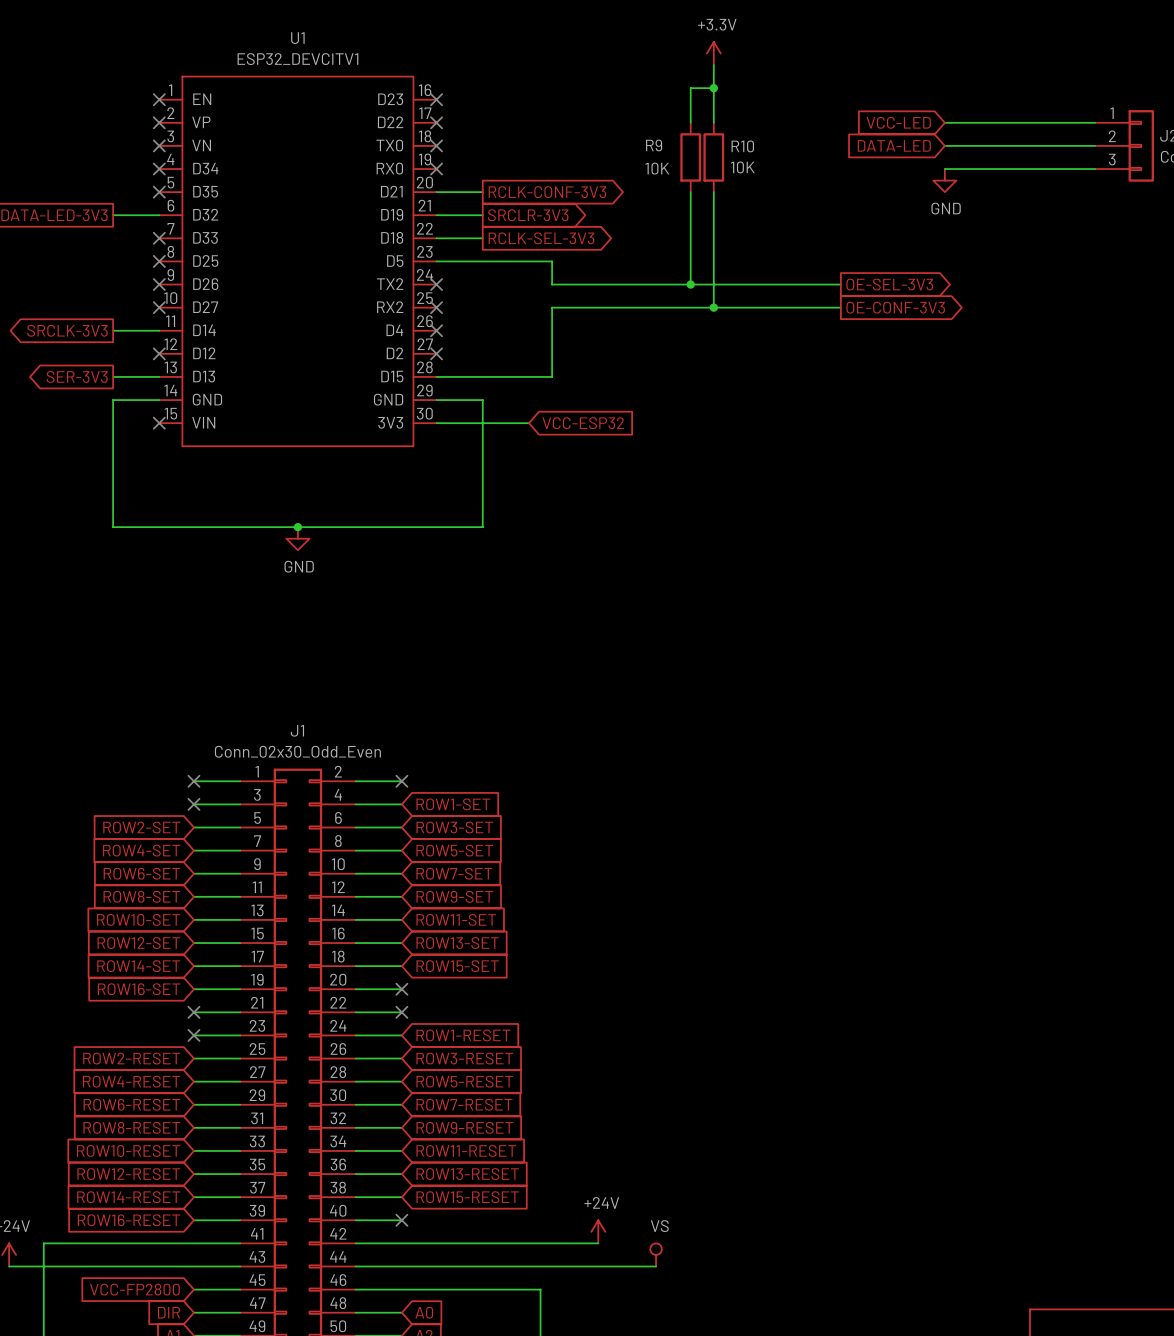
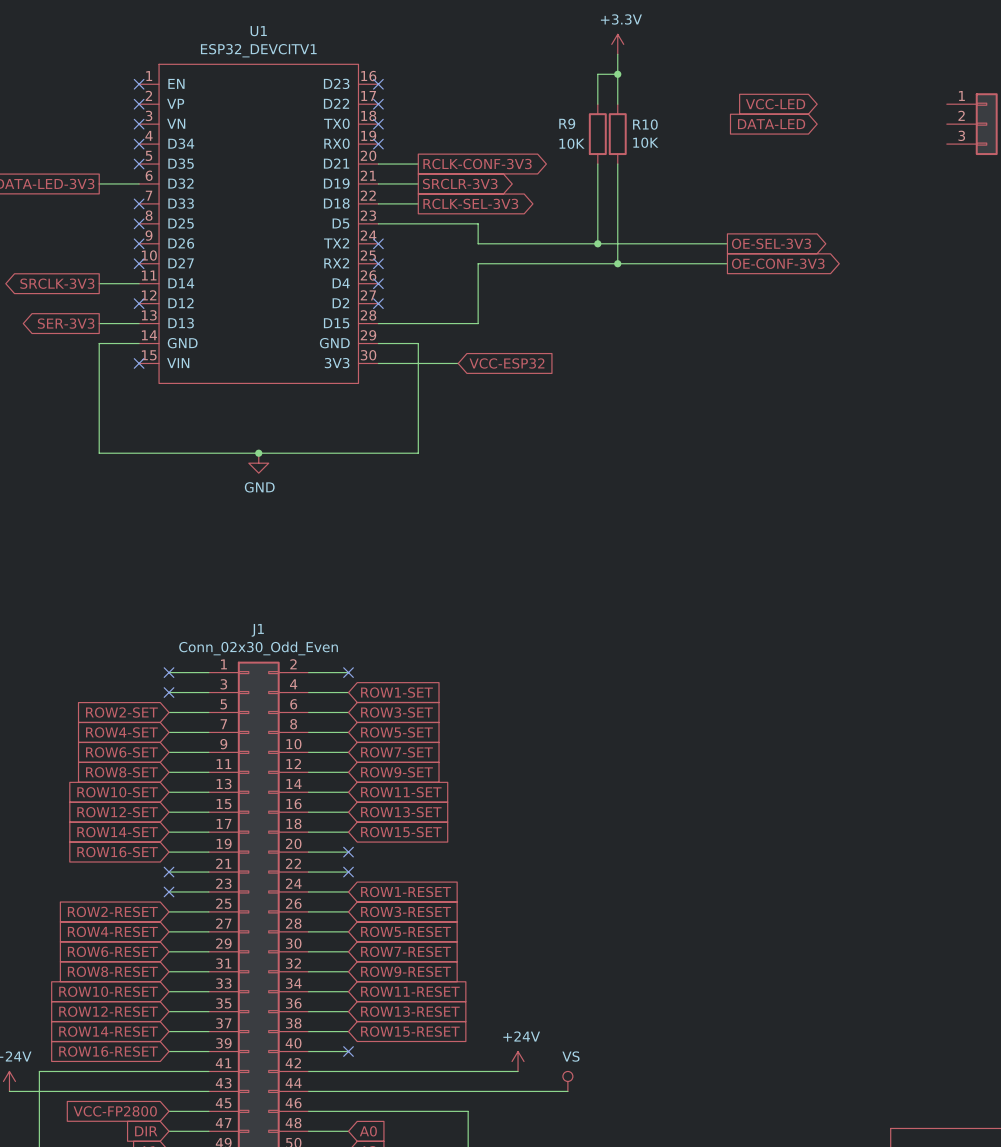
wire: (944, 122) (1095, 122) -> none
wire: (944, 145) (1095, 145) -> none
wire: (944, 169) (1095, 169) -> none
power symbol: GND (944, 180) -> none

